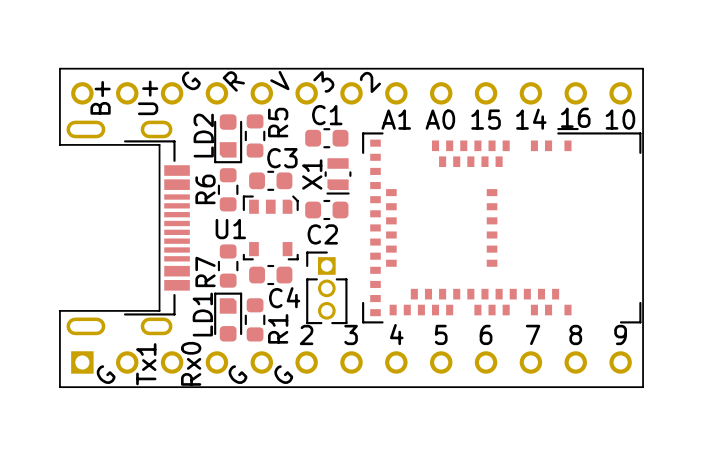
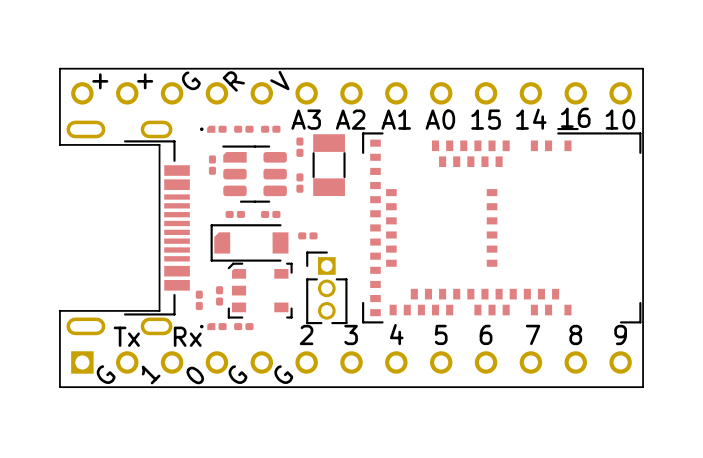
text: 3 (323, 81) -> A3 (306, 119)
text: 2 (370, 82) -> A2 (350, 119)
text: B+ (100, 97) -> + (100, 81)
text: U+ (148, 97) -> + (145, 81)
part: none -> (213, 129)
part: none -> (243, 129)
part: none -> (270, 129)
R5: (255, 135) -> none
LD2: (228, 138) -> none
C1: (326, 138) -> none
part: none -> (299, 147)
part: none -> (212, 165)
part: none -> (329, 165)
part: none -> (254, 174)
X1: (338, 176) -> none
C3: (270, 180) -> none
part: none -> (299, 183)
R6: (228, 189) -> none
C2: (326, 209) -> none
part: none -> (235, 214)
part: none -> (270, 214)
U1: (272, 226) -> none
part: none -> (307, 235)
part: none -> (249, 242)
R7: (228, 266) -> none
C4: (270, 275) -> none
part: none -> (258, 289)
part: none -> (219, 295)
part: none -> (199, 300)
LD1: (228, 317) -> none
R1: (255, 319) -> none
part: none -> (213, 326)
part: none -> (243, 326)
text: none -> Tx (126, 336)
text: none -> Rx (187, 336)
text: Rx0 (191, 363) -> 0 (195, 375)
text: Tx1 (146, 364) -> 1 (151, 375)

